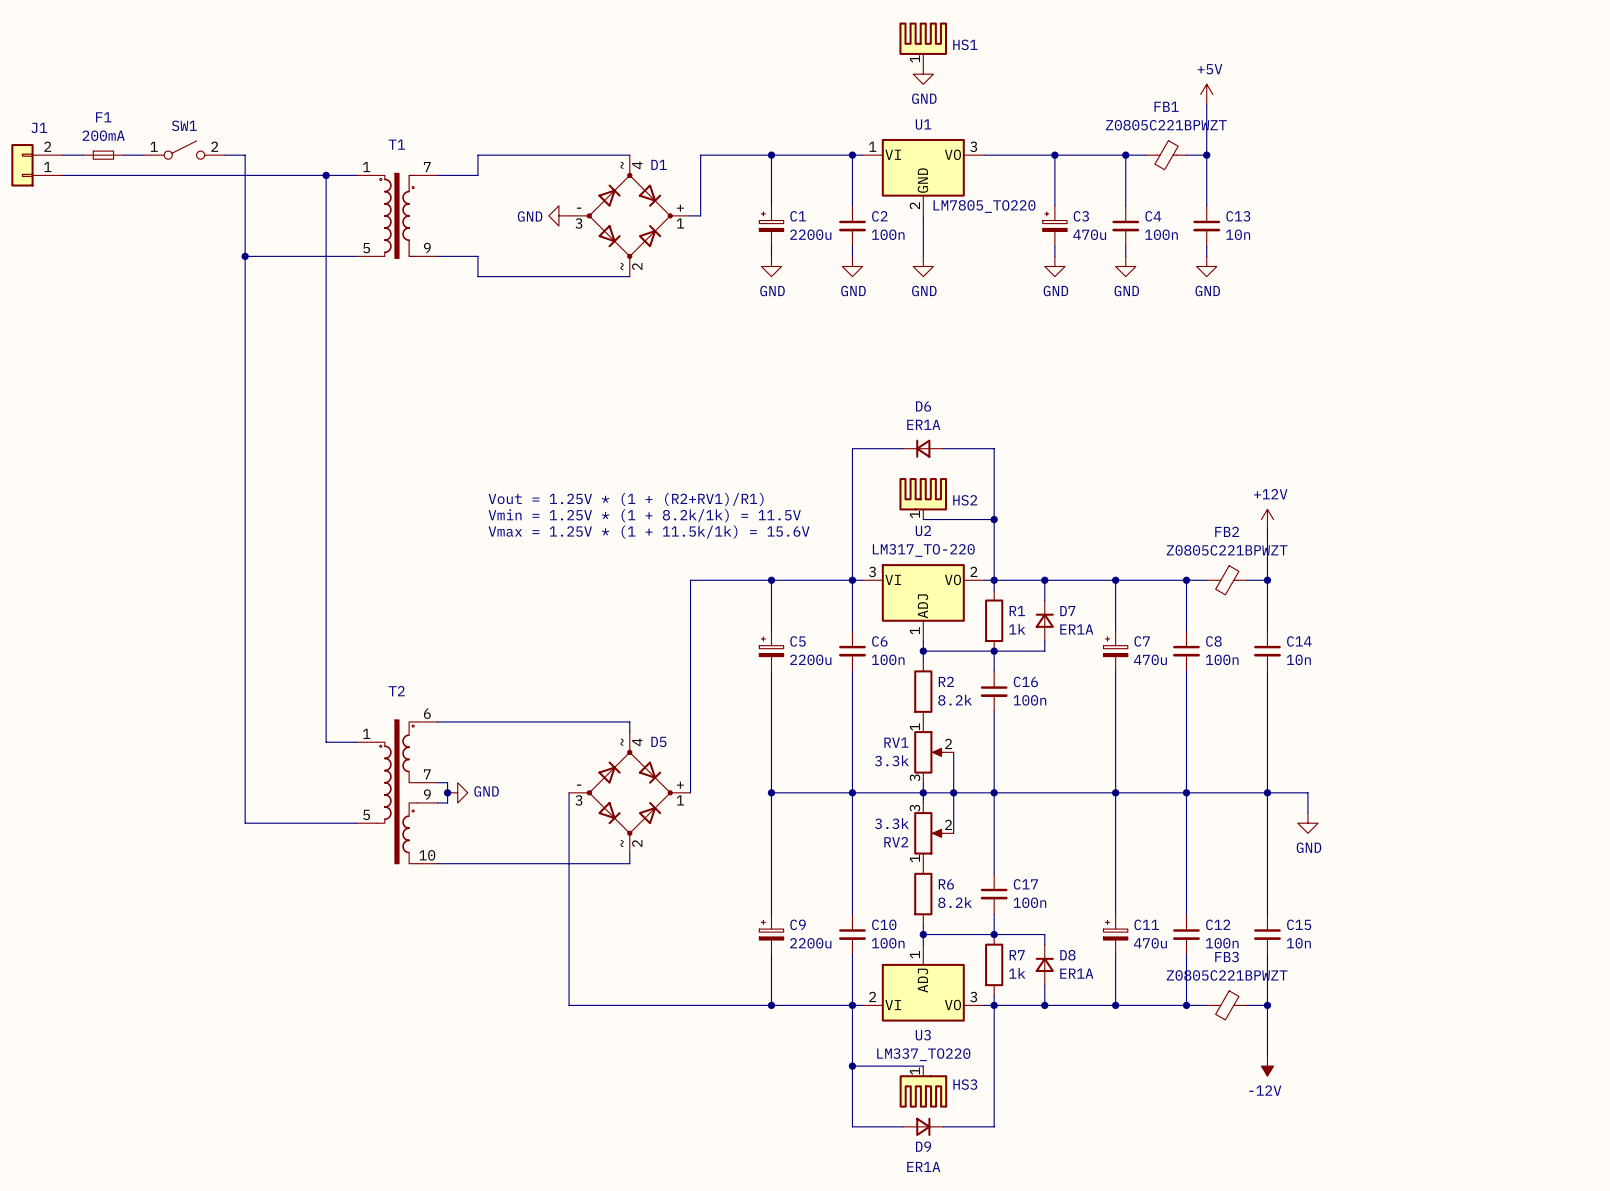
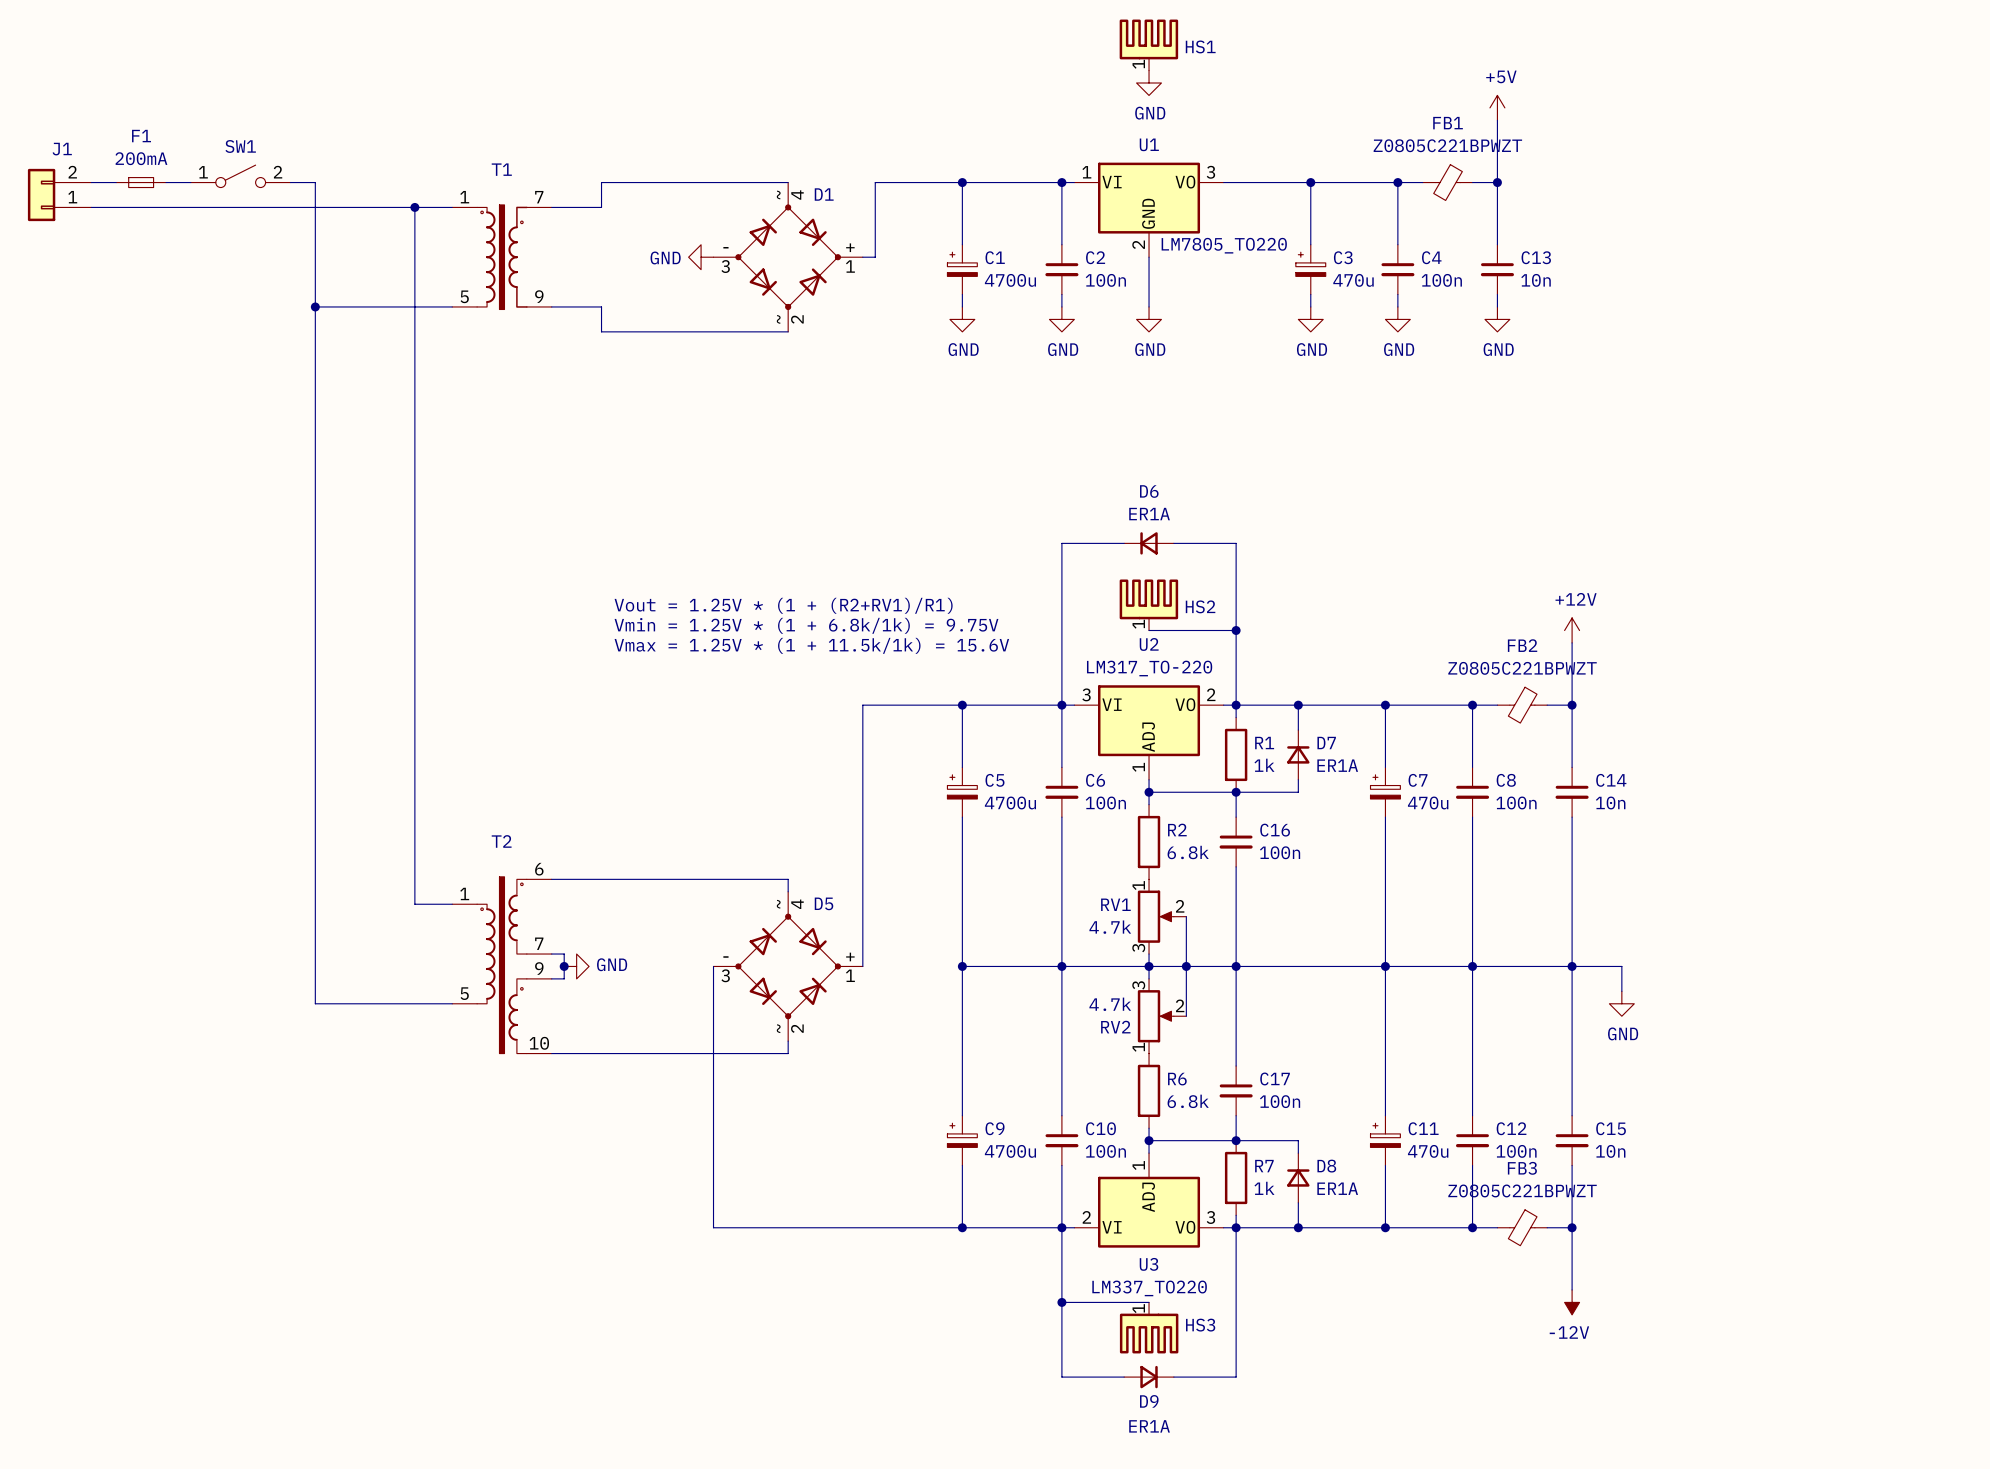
C1 value: 2200u (810, 234) -> 4700u (1010, 280)
text: Vmin = 1.25V * (1 + 8.2k/1k) = 11.5V (644, 515) -> Vmin = 1.25V * (1 + 6.8k/1k) = 9.75V (806, 625)
C5 value: 2200u (810, 659) -> 4700u (1010, 802)
R2 value: 8.2k (955, 700) -> 6.8k (1188, 852)
RV1 value: 3.3k (891, 760) -> 4.7k (1110, 927)
RV2 value: 3.3k (891, 823) -> 4.7k (1110, 1004)
R6 value: 8.2k (955, 902) -> 6.8k (1188, 1101)
C9 value: 2200u (810, 943) -> 4700u (1010, 1151)

